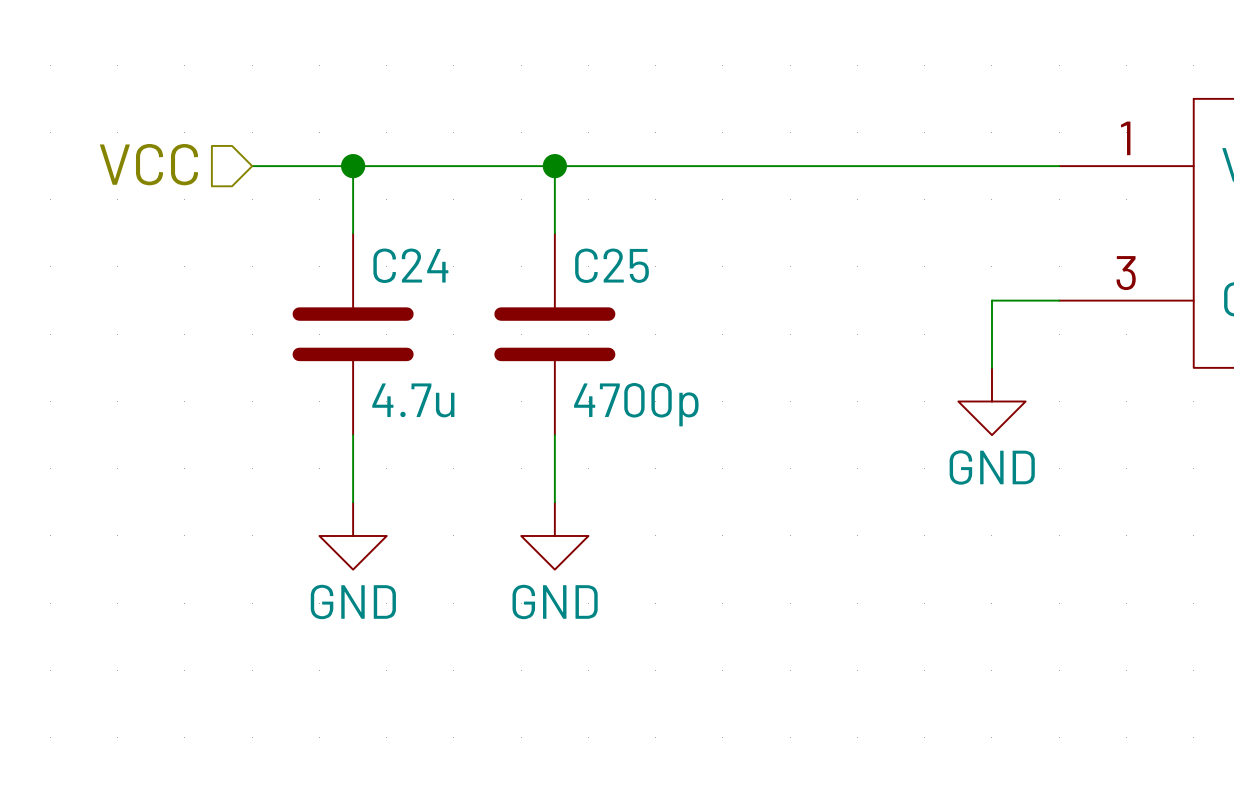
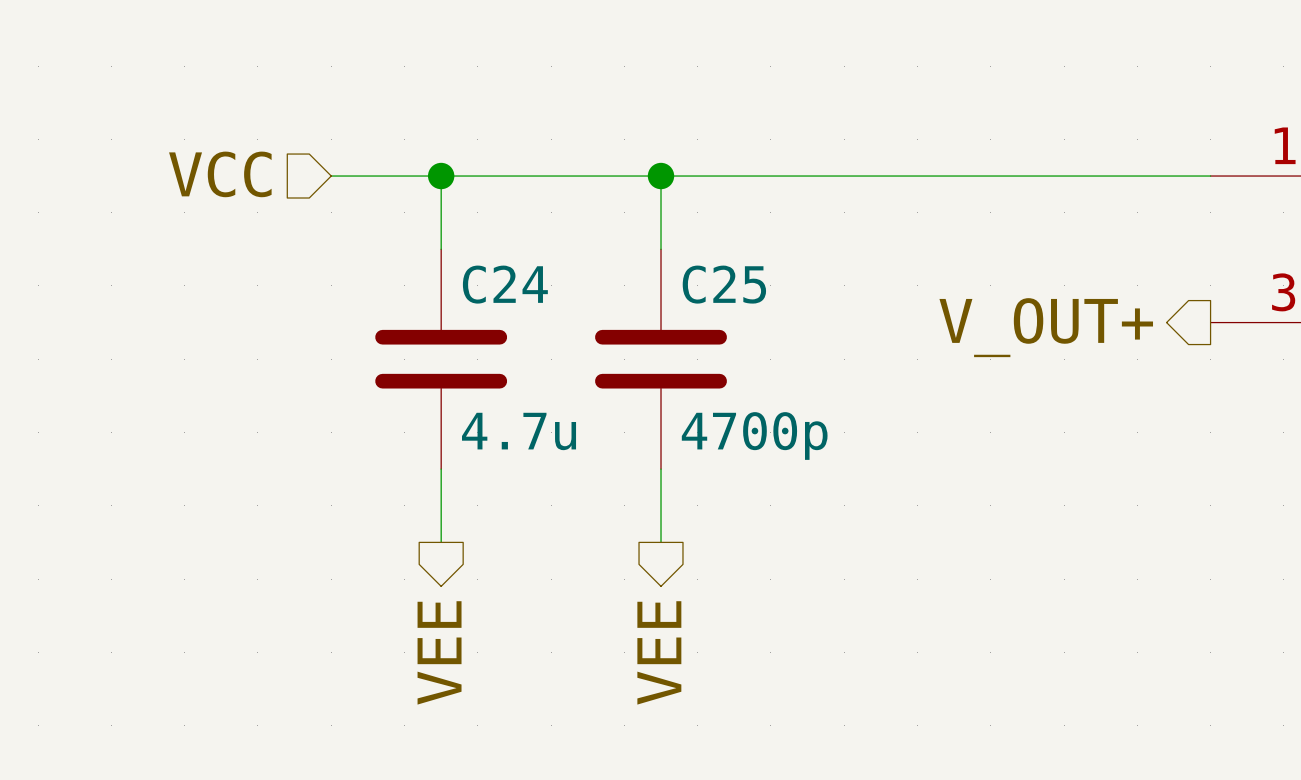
hierarchical label: none -> V_OUT+ (1046, 327)
wire: (1059, 300) (991, 300) (991, 367) -> none
power symbol: GND (991, 401) -> none
power symbol: GND (353, 535) -> none
power symbol: GND (554, 535) -> none
hierarchical label: none -> VEE (439, 652)
hierarchical label: none -> VEE (659, 652)

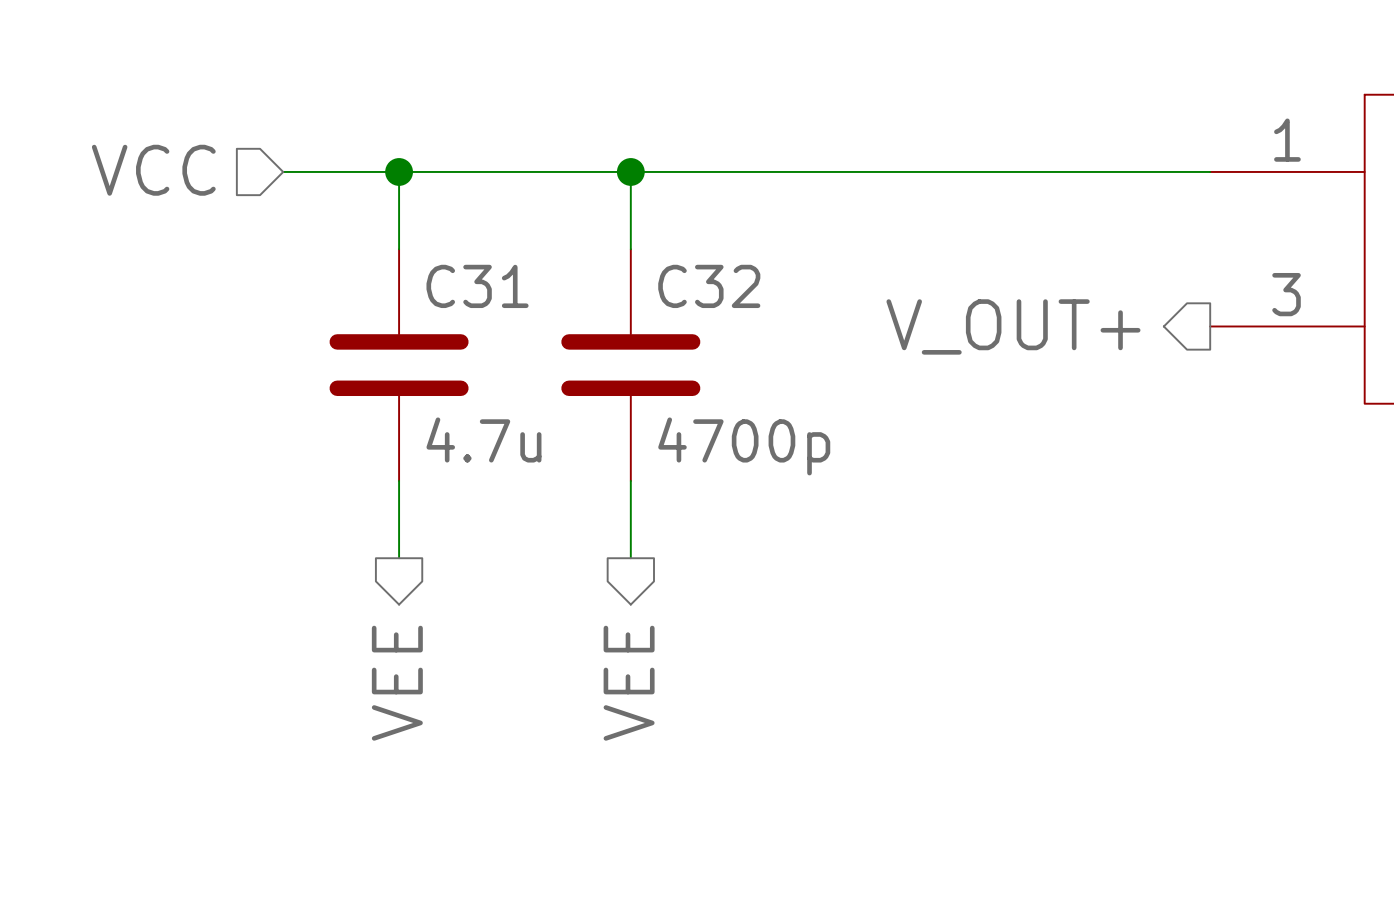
C24 name: C24 (505, 284) -> C31 (477, 286)
C25 name: C25 (724, 284) -> C32 (709, 286)

